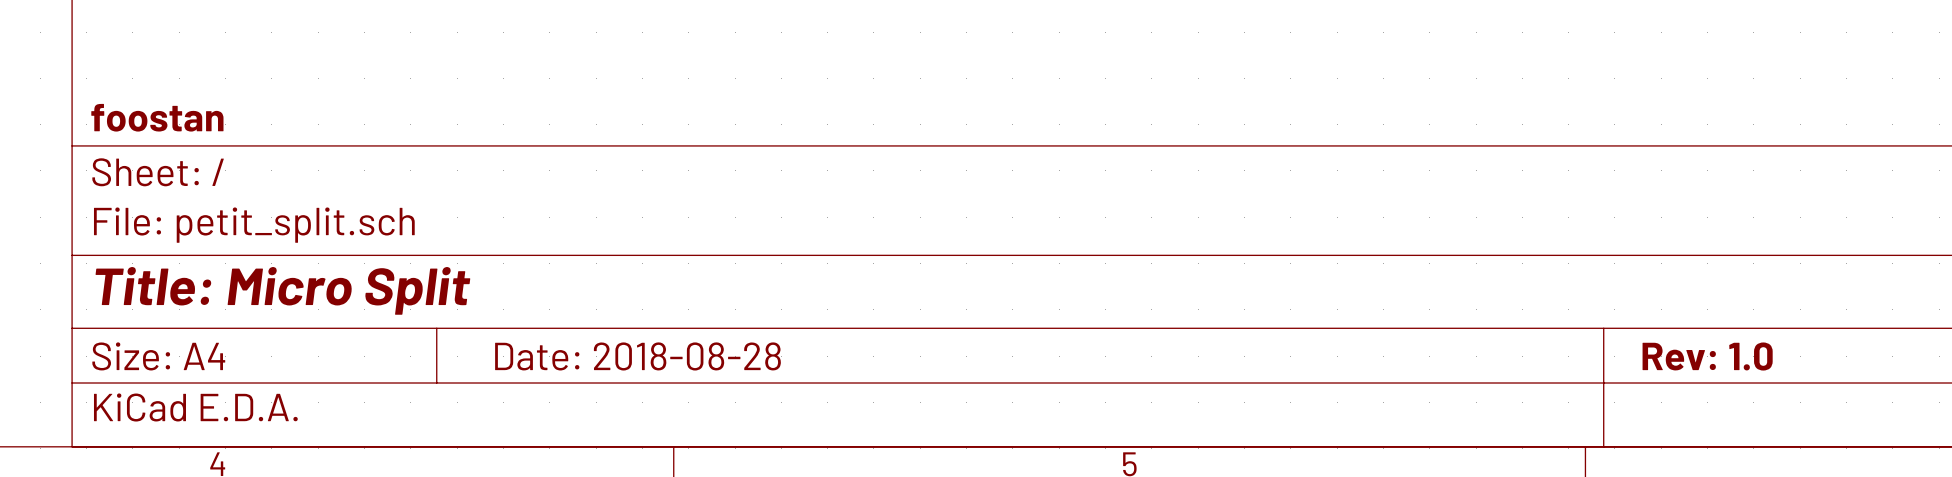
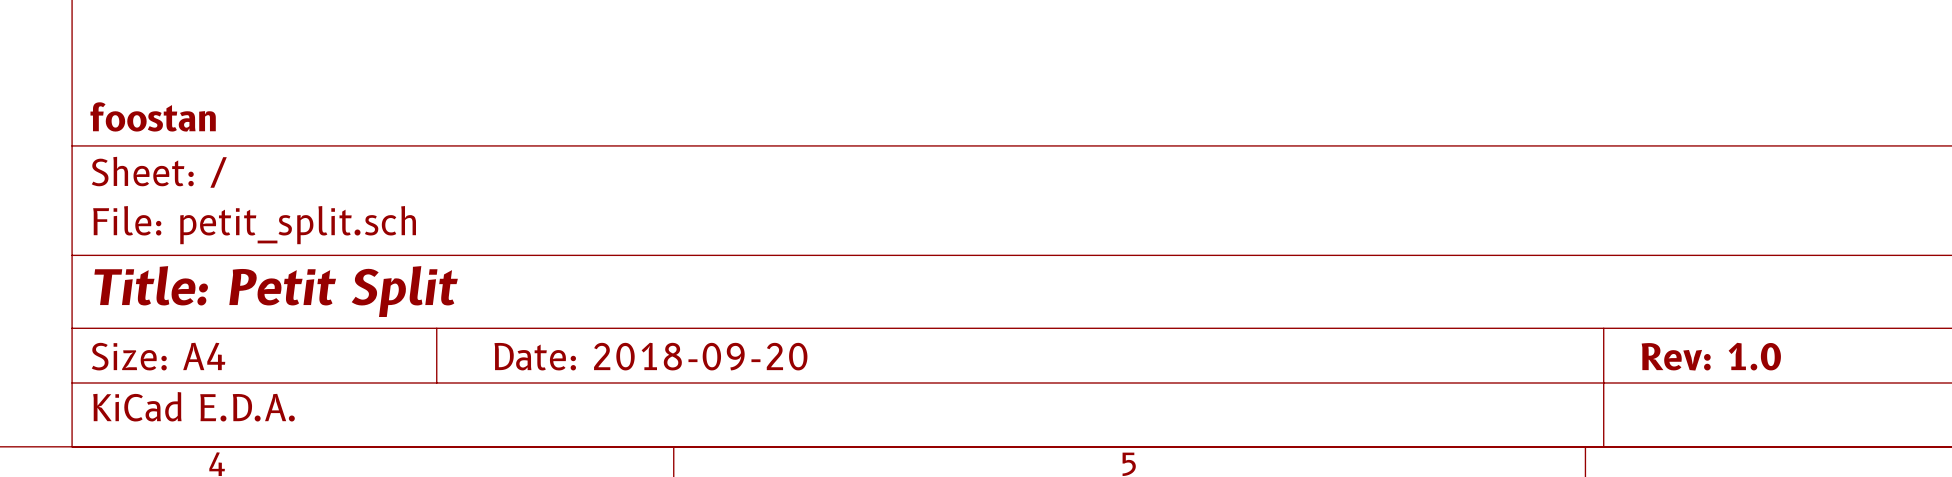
title block: Title: Micro Split (282, 290) -> Title: Petit Split (276, 291)
title block: Date: 2018-08-28 (637, 356) -> Date: 2018-09-20 (650, 356)

